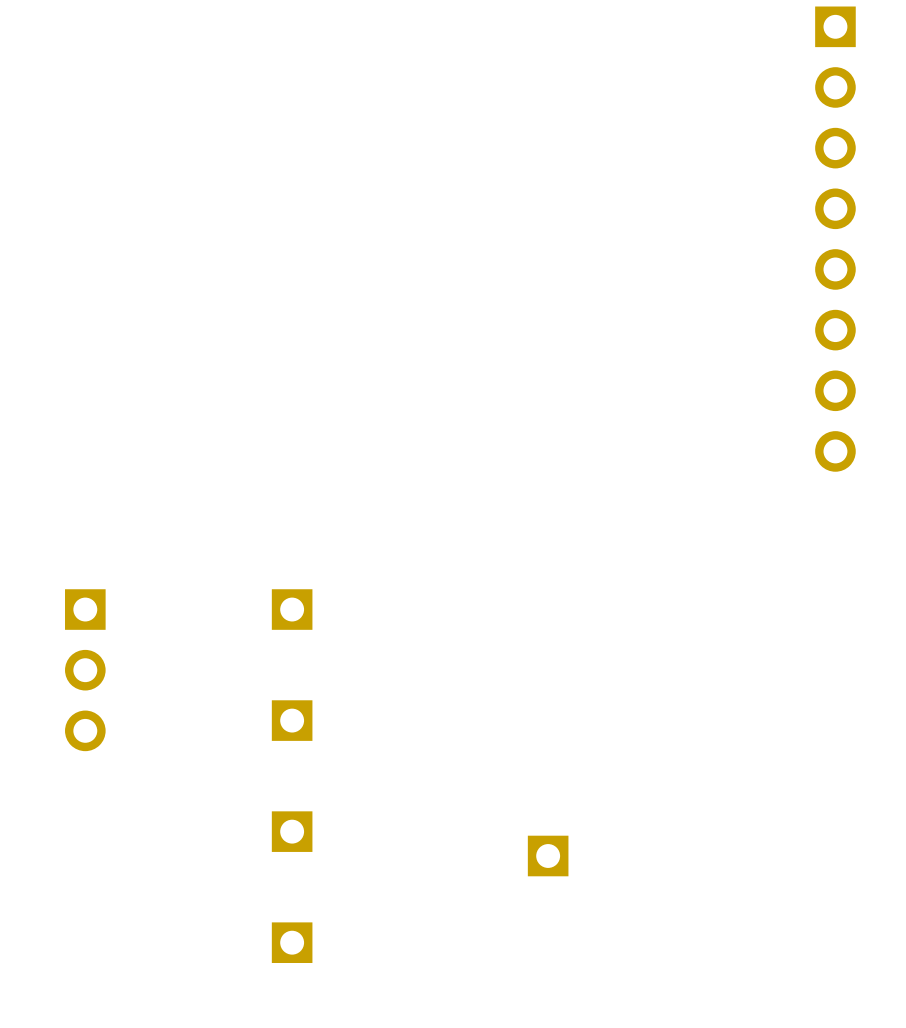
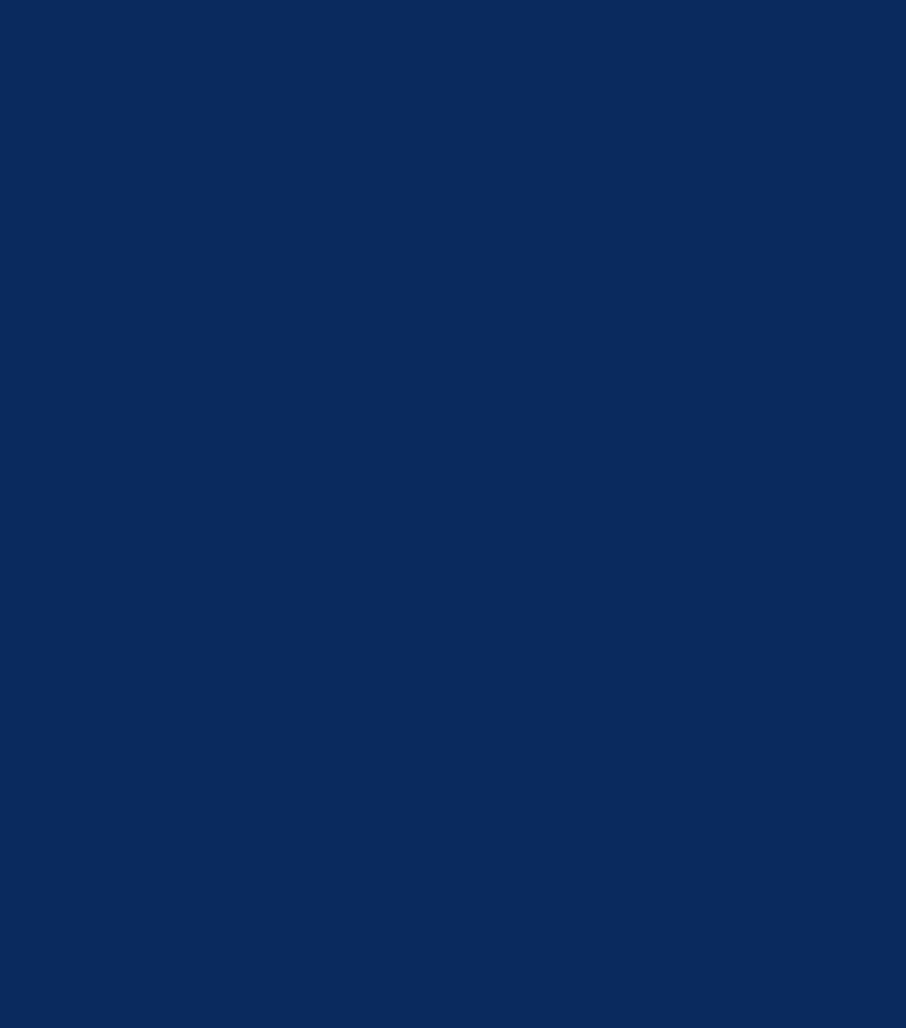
part: (835, 239) -> none
part: (292, 609) -> none
part: (85, 670) -> none
part: (292, 720) -> none
part: (292, 831) -> none
part: (548, 855) -> none
part: (292, 942) -> none

